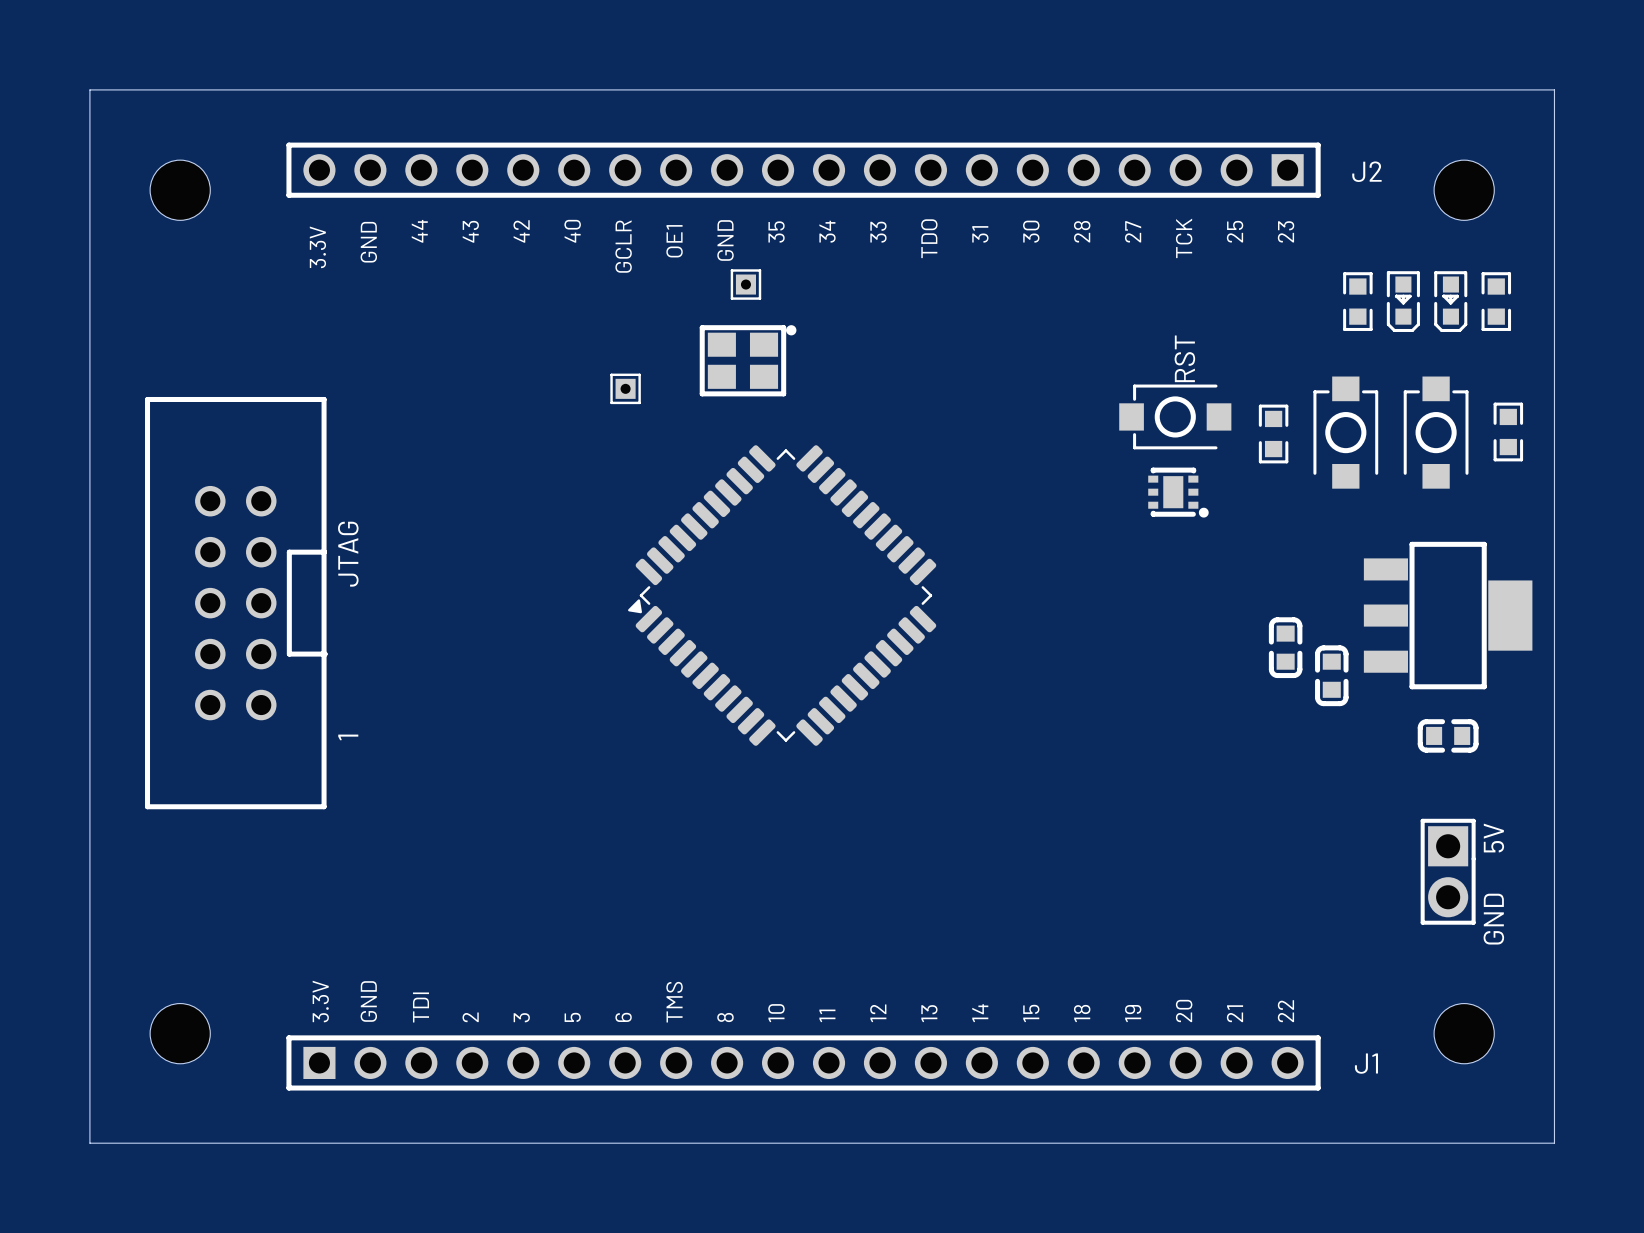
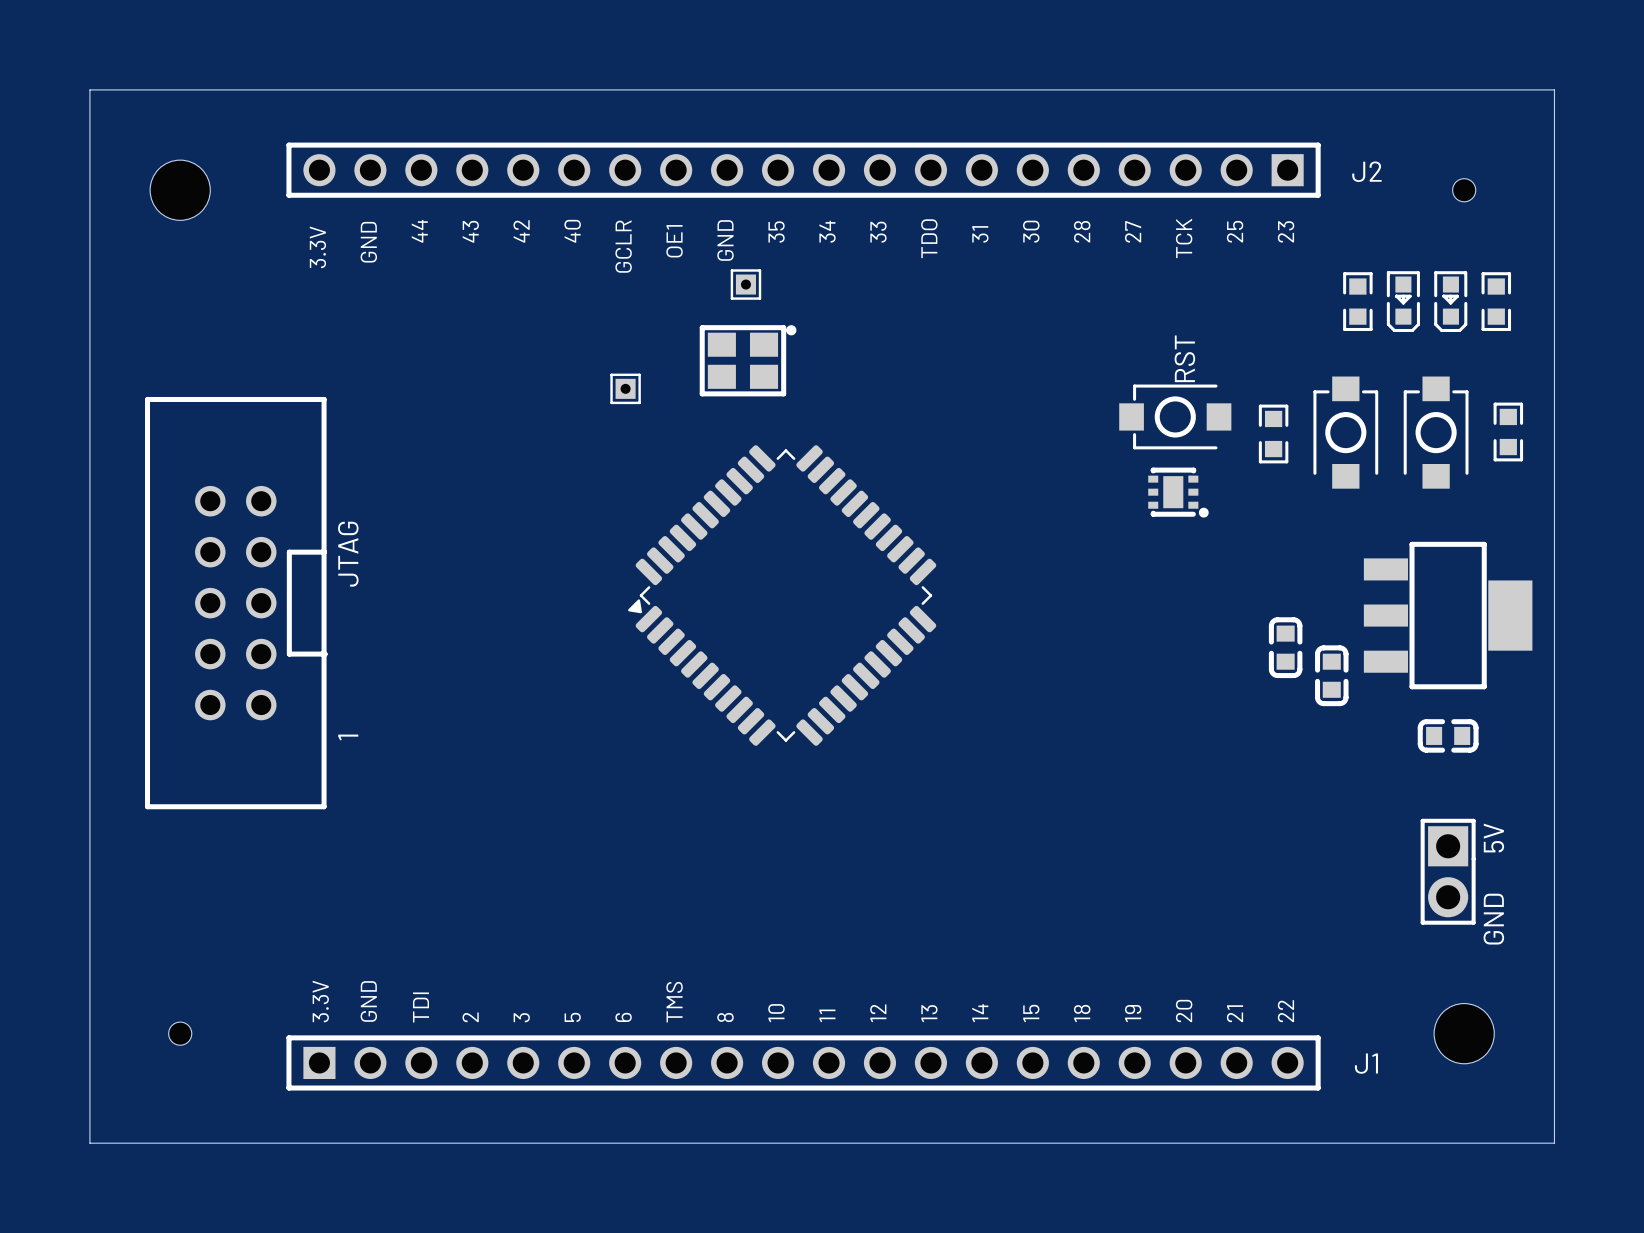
part footprint: [1434, 160, 1495, 221] -> [1452, 178, 1476, 202]
part footprint: [150, 1003, 211, 1064] -> [168, 1022, 192, 1046]

